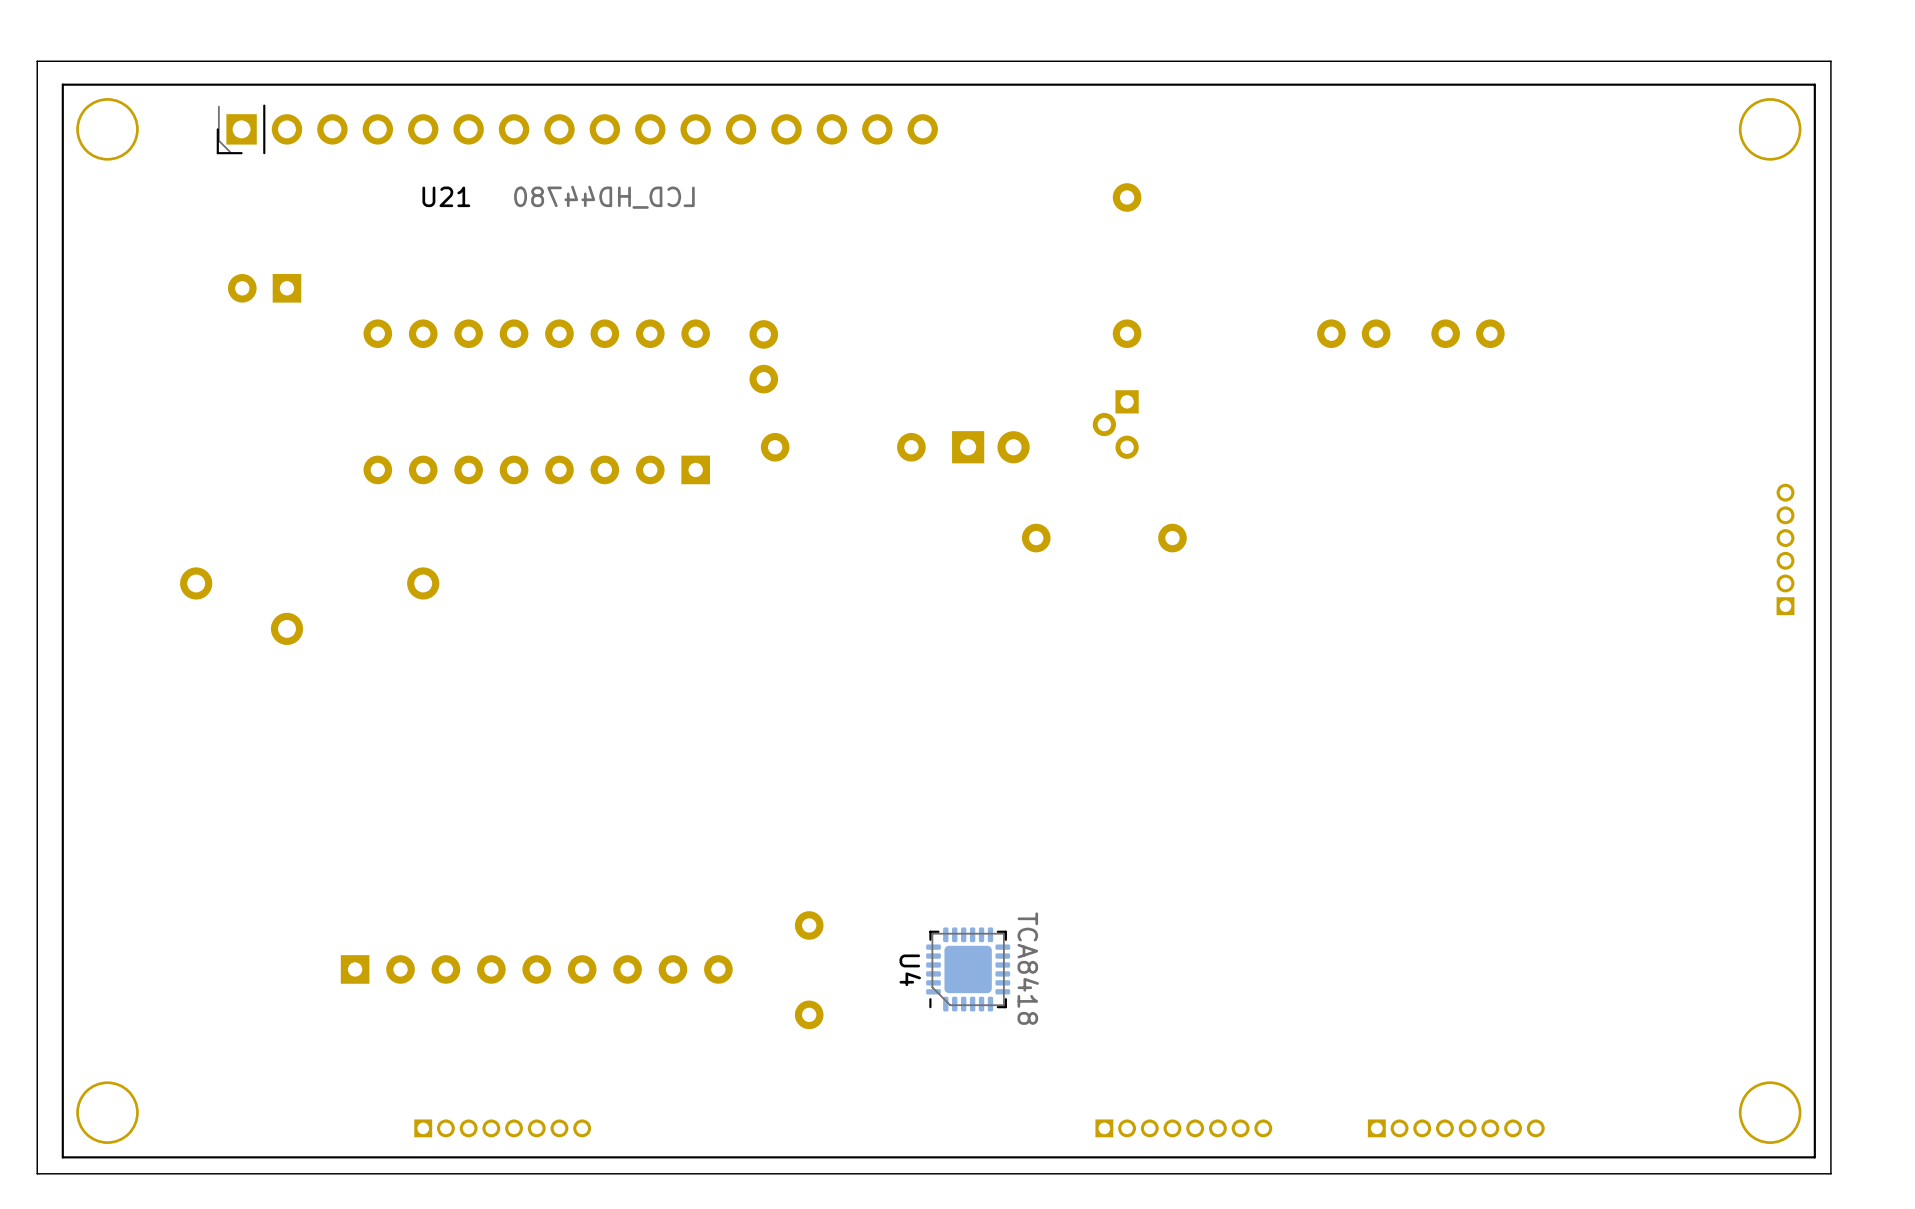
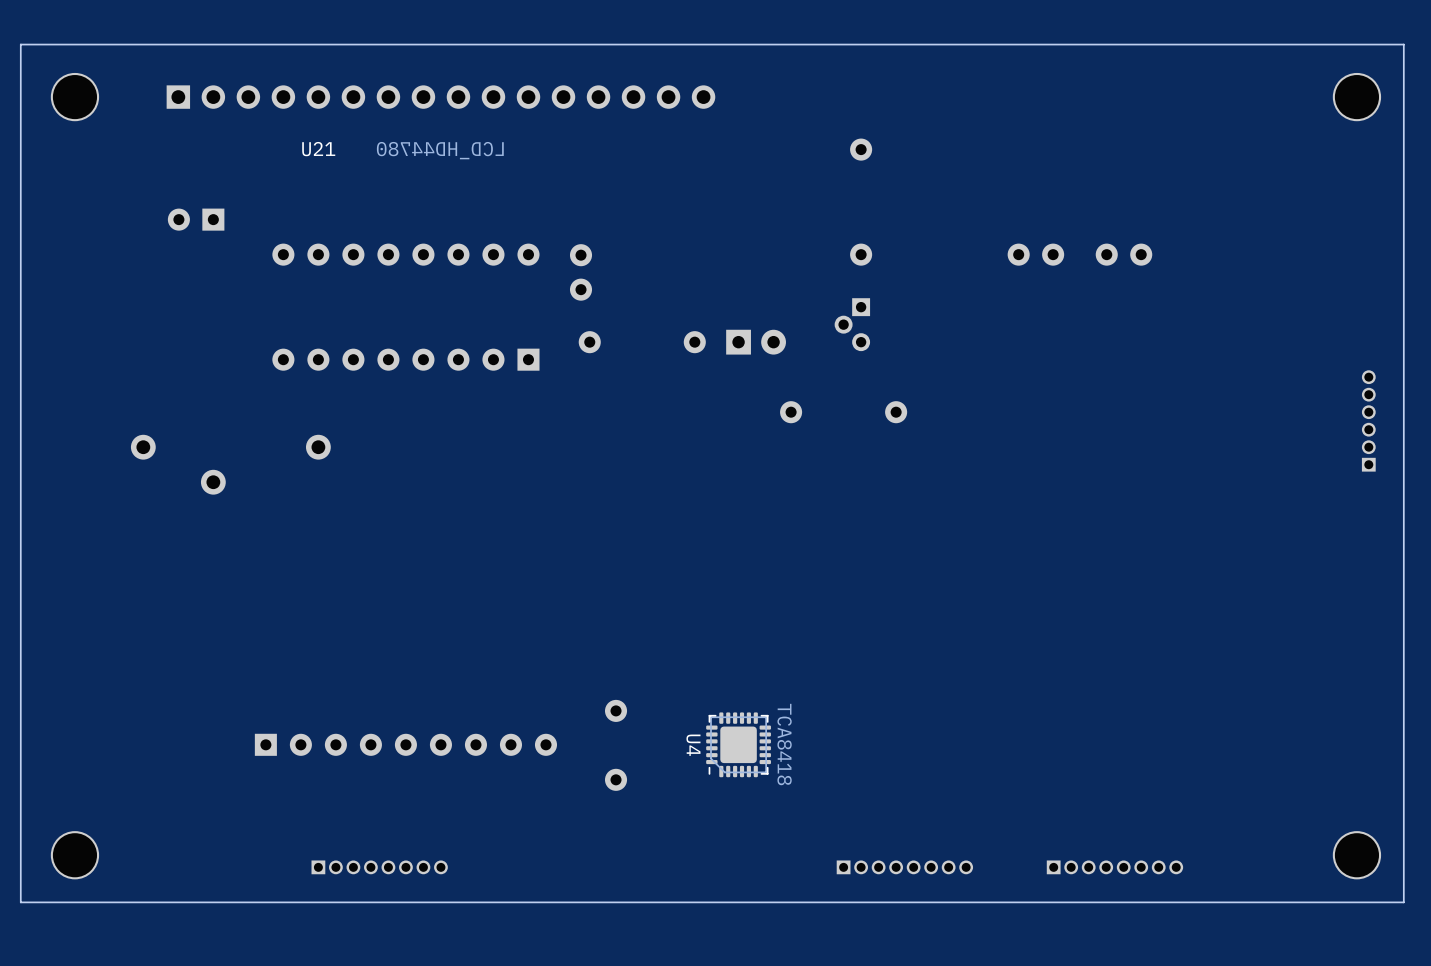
U21 footprint: [61, 83, 1816, 1159] -> [50, 72, 1382, 880]

